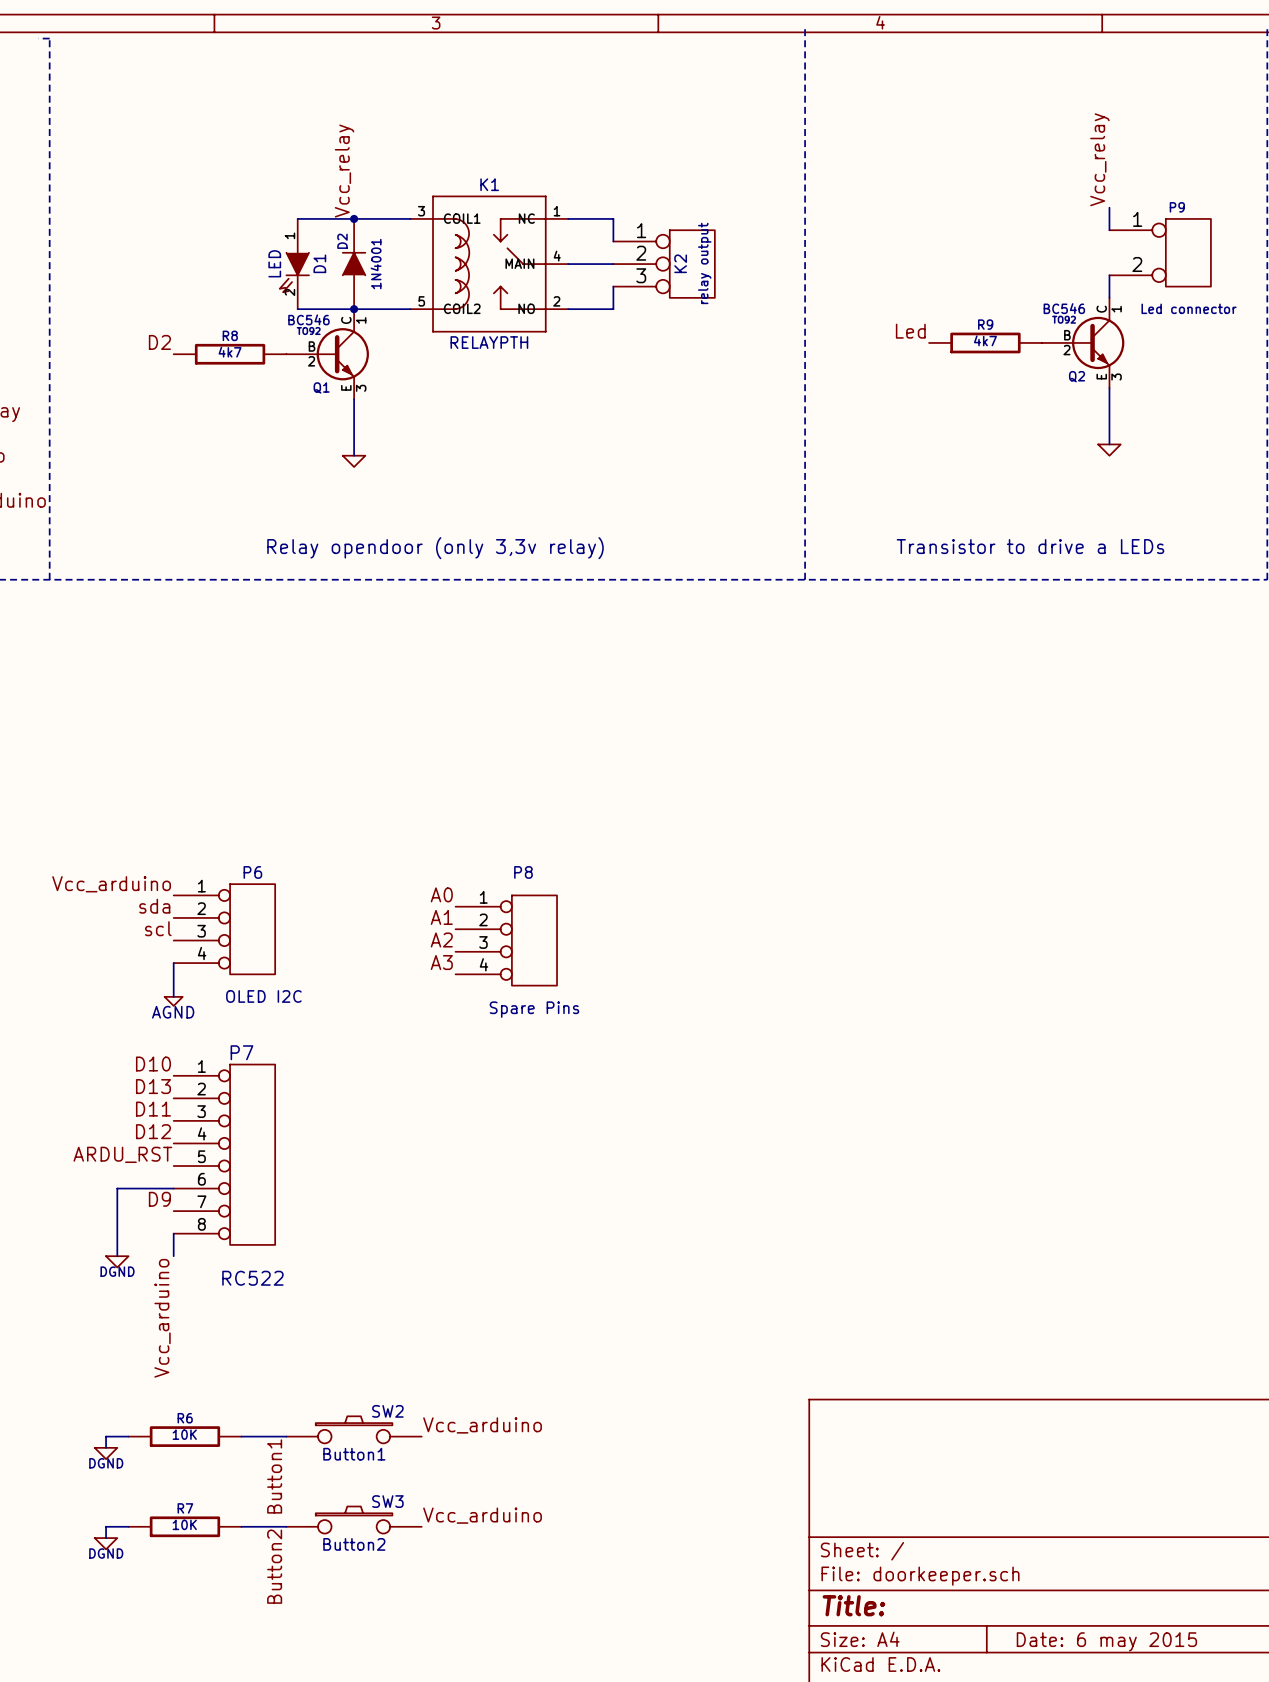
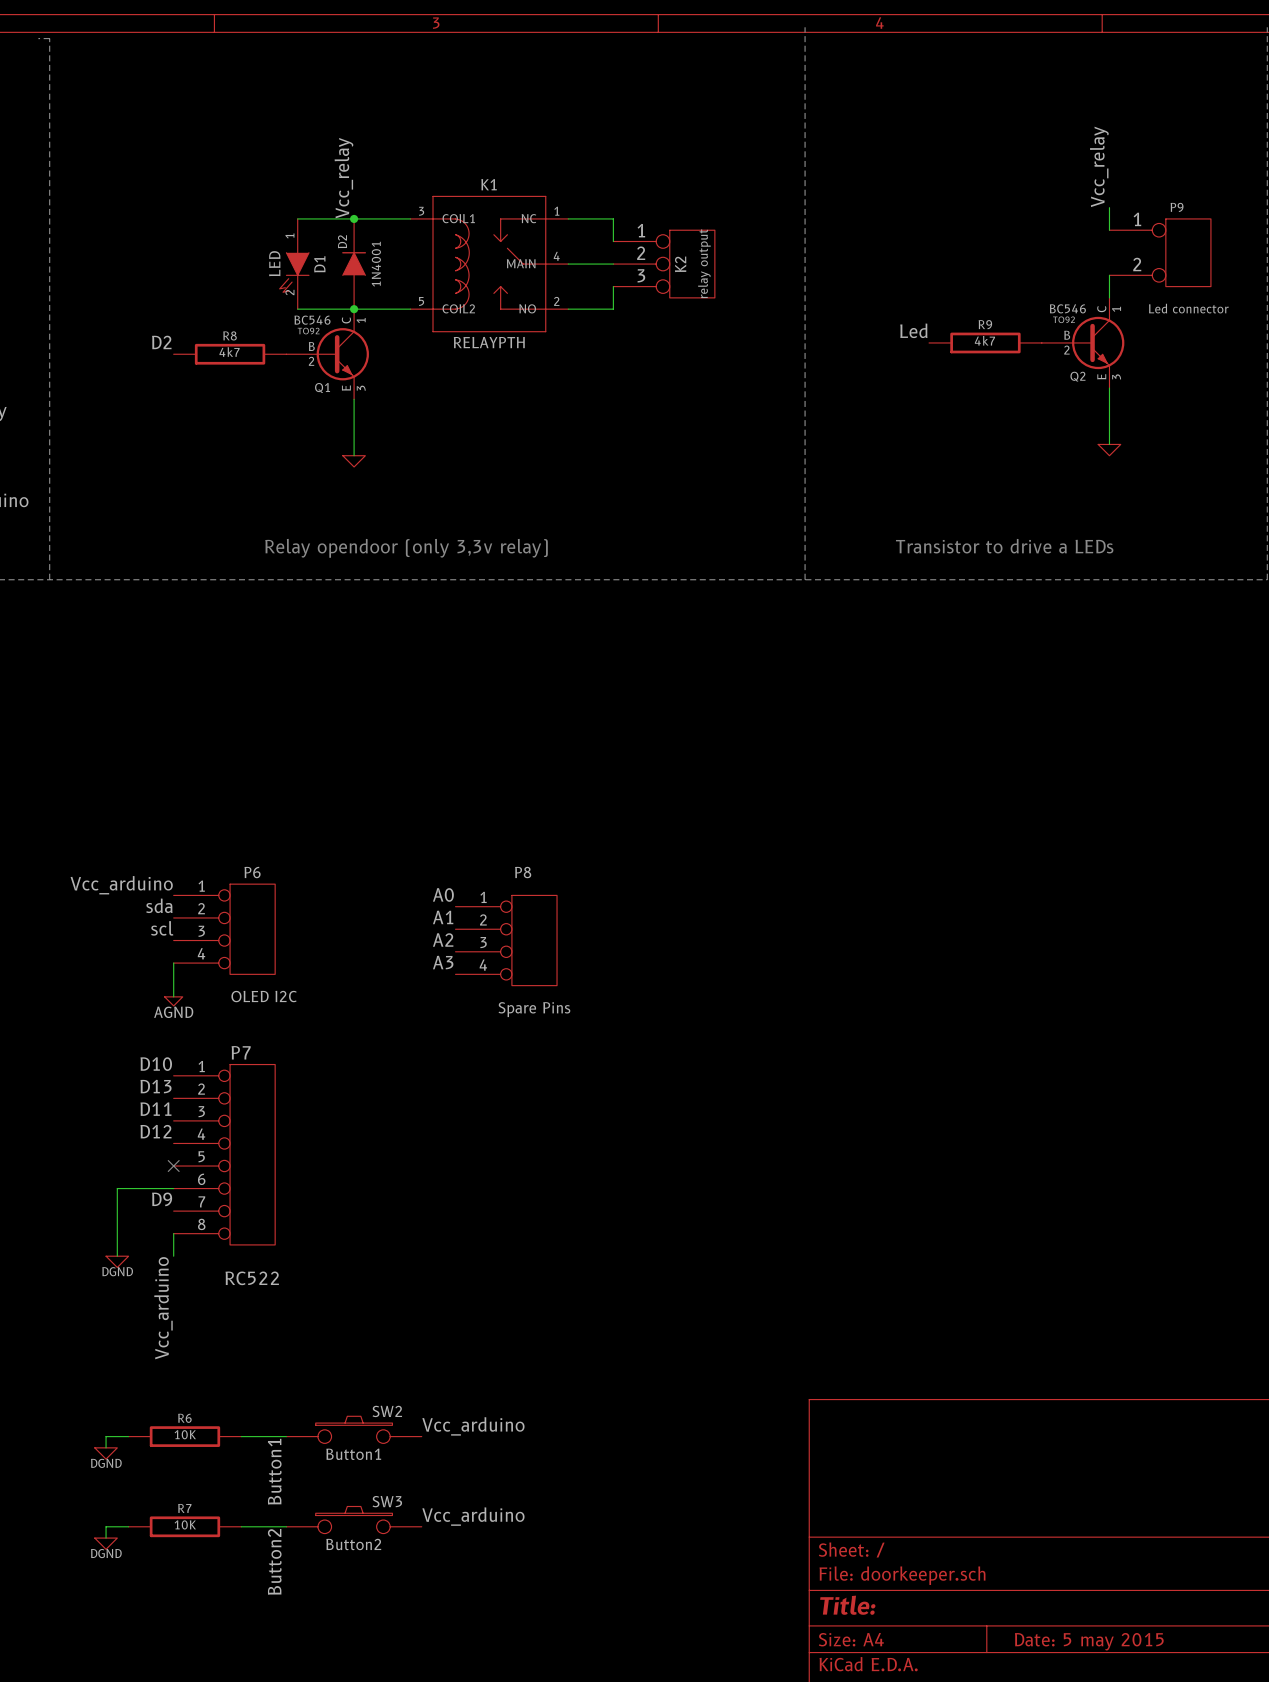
label: ARDU_RST (122, 1154) -> none
no-connect mark: none -> (173, 1166)
title block: Date: 6 may 2015 (1106, 1641) -> Date: 5 may 2015 (1089, 1641)

